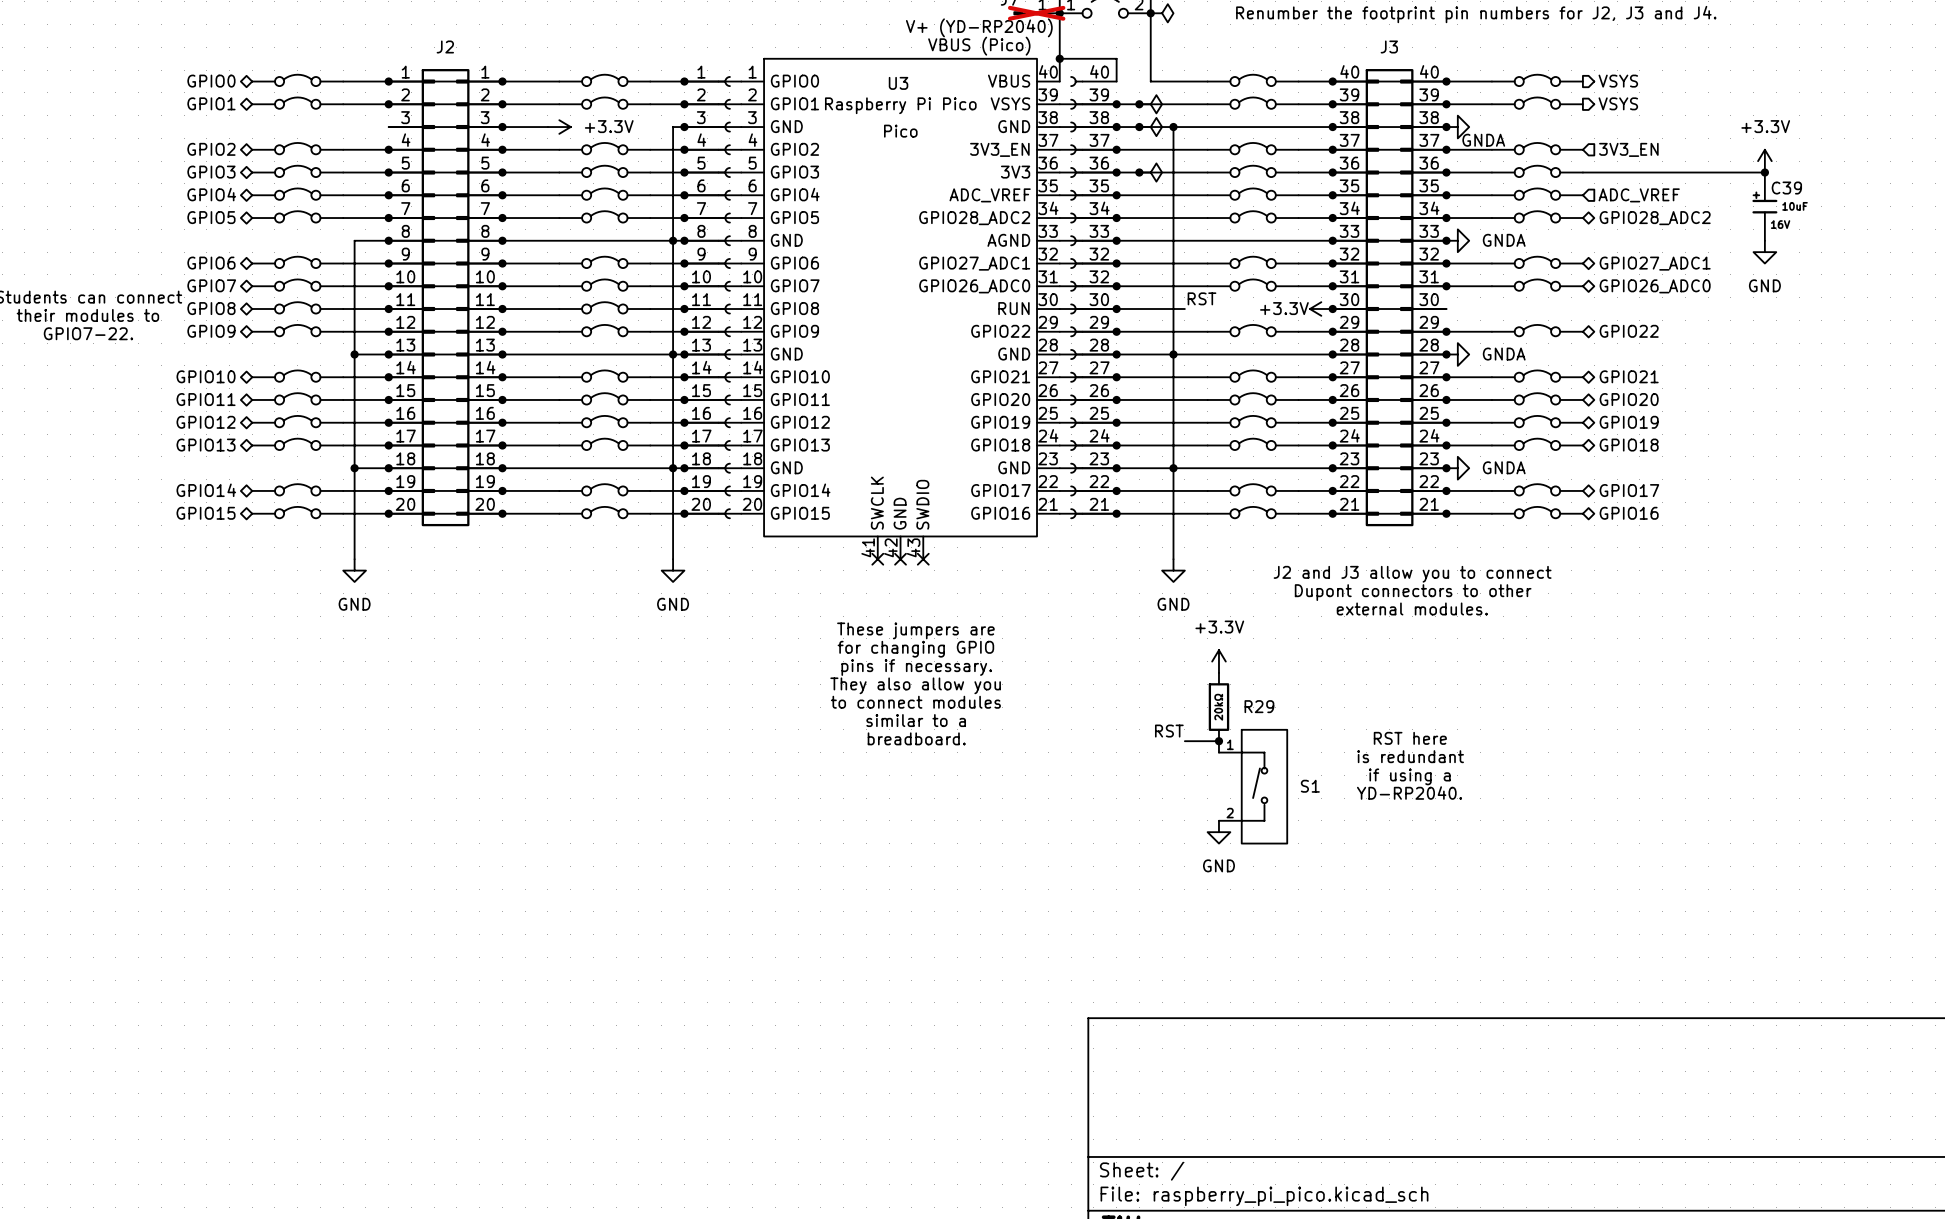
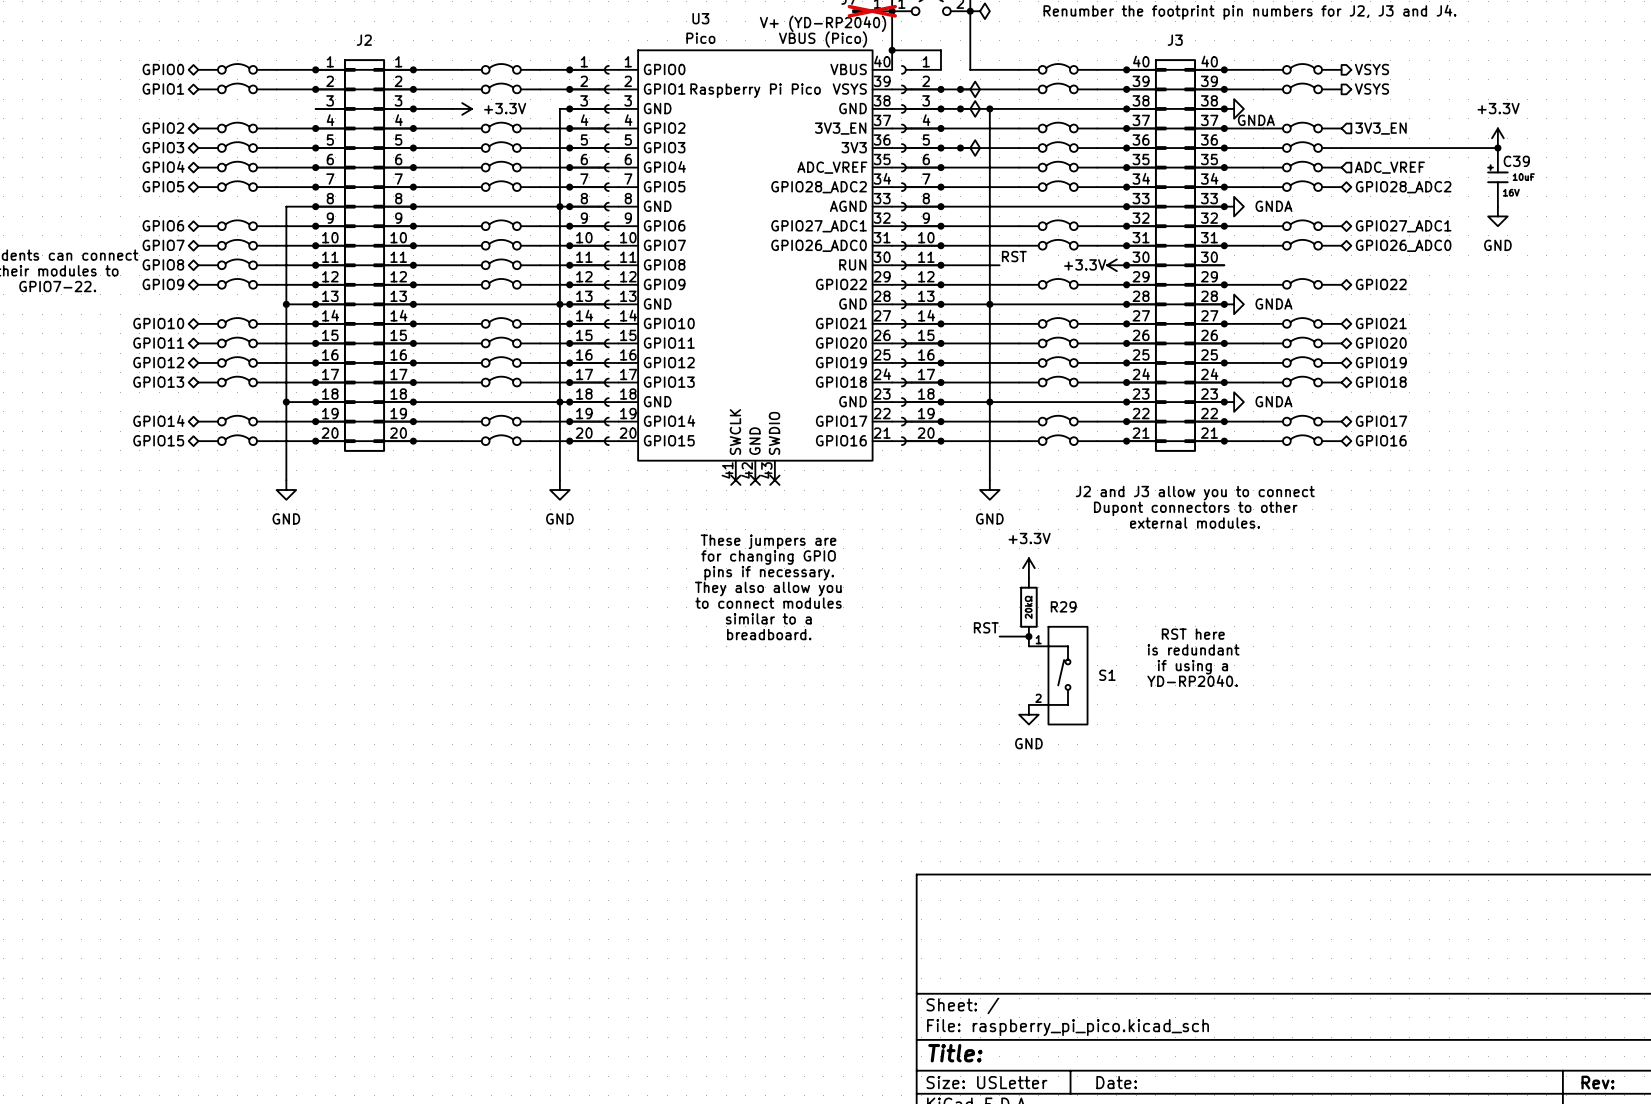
part symbol: [1070, 76, 1117, 519] -> [901, 65, 941, 446]
U3 name position: U3 (898, 83) -> U3 (700, 18)
U3 value position: Pico (900, 131) -> Pico (700, 38)

